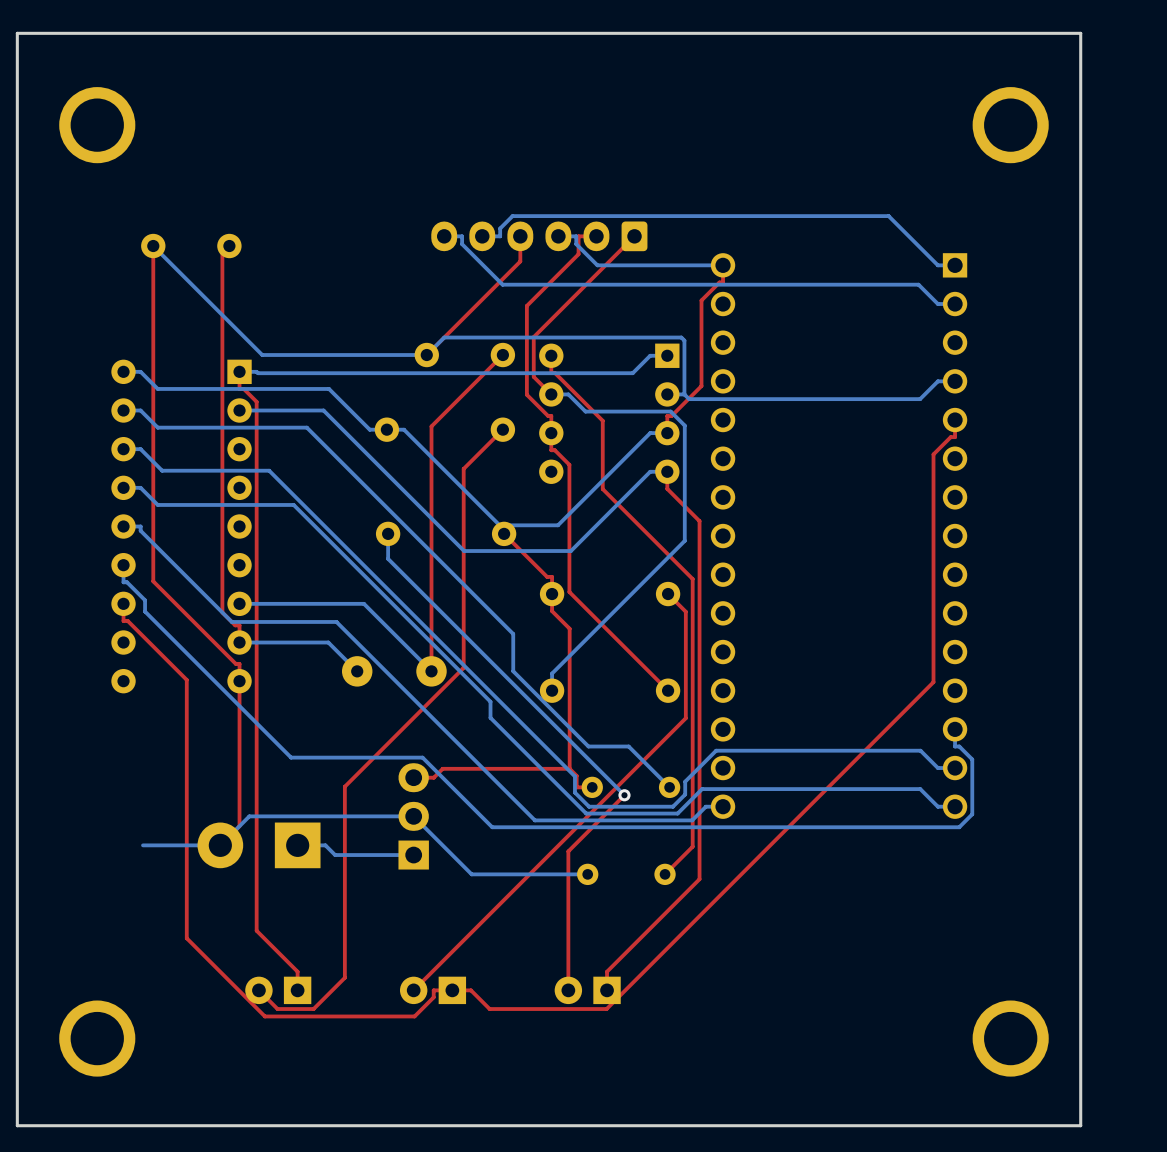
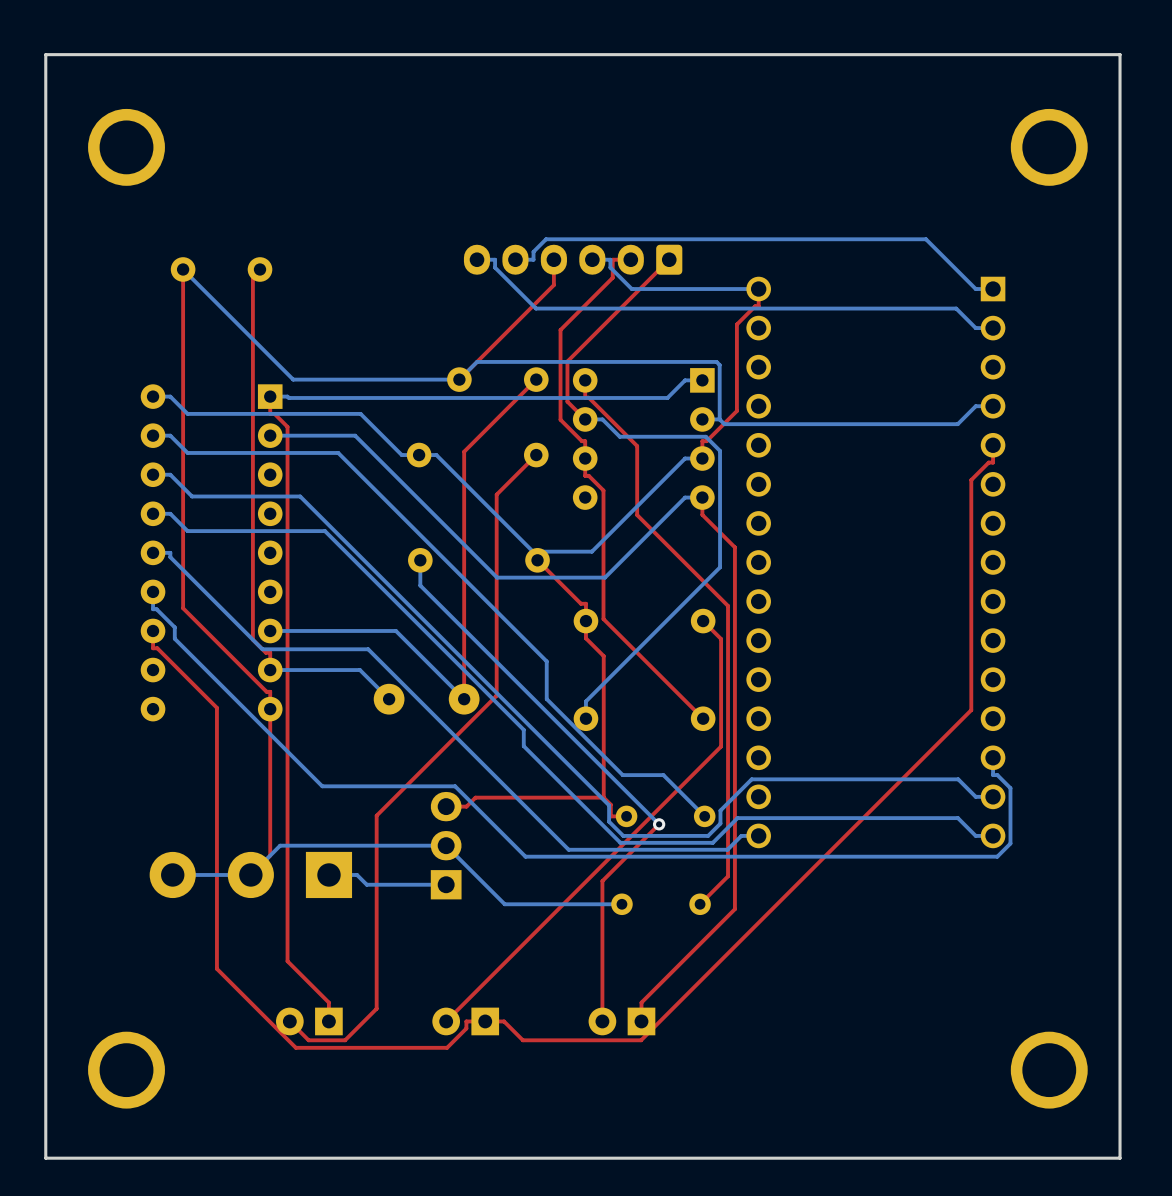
part: none -> (250, 874)

